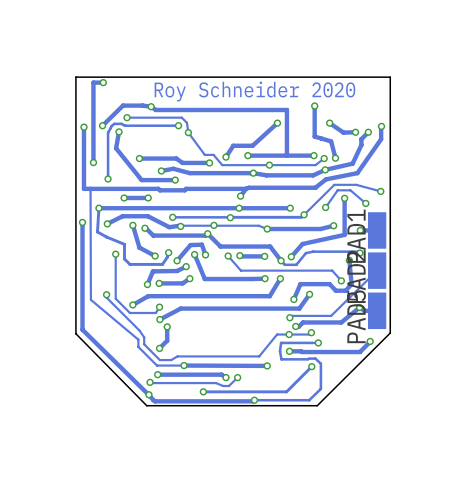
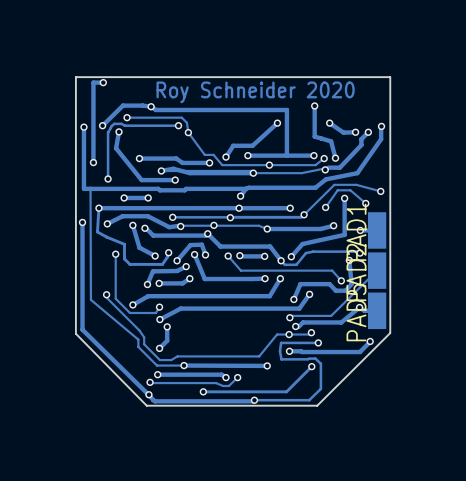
track: (361, 145) (352, 163) (325, 169) (313, 175) (266, 175) (253, 173) -> (361, 145) (339, 167) (328, 167) (301, 173) (161, 170)

